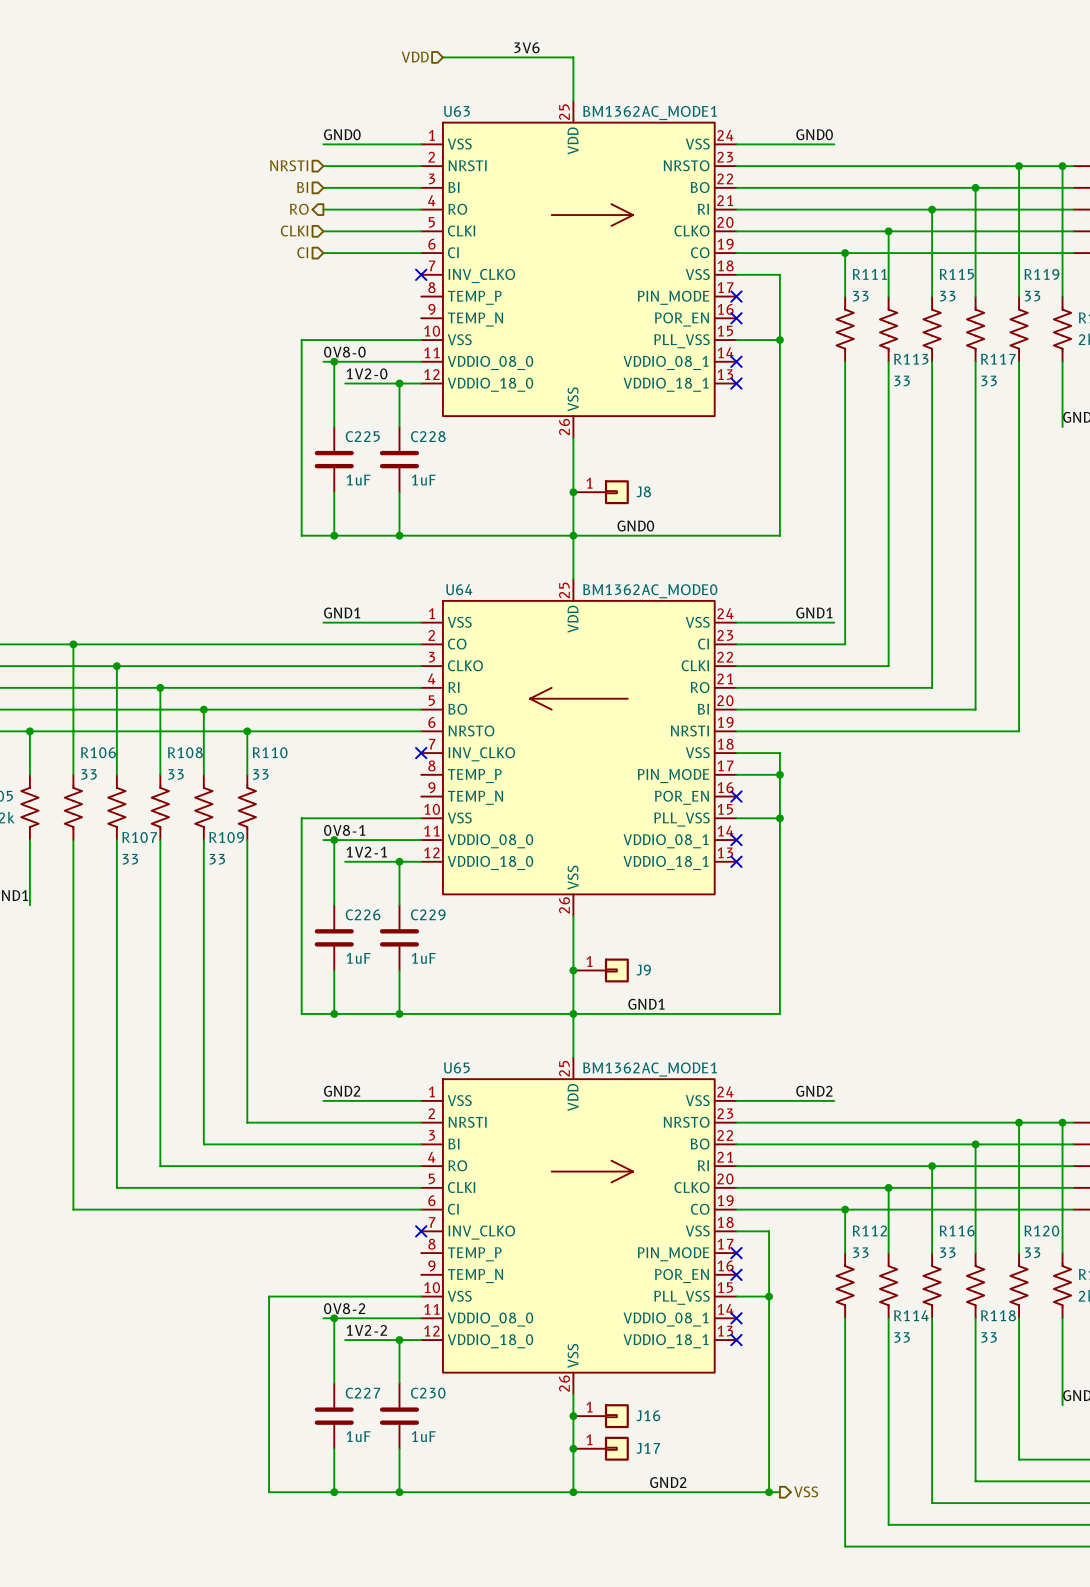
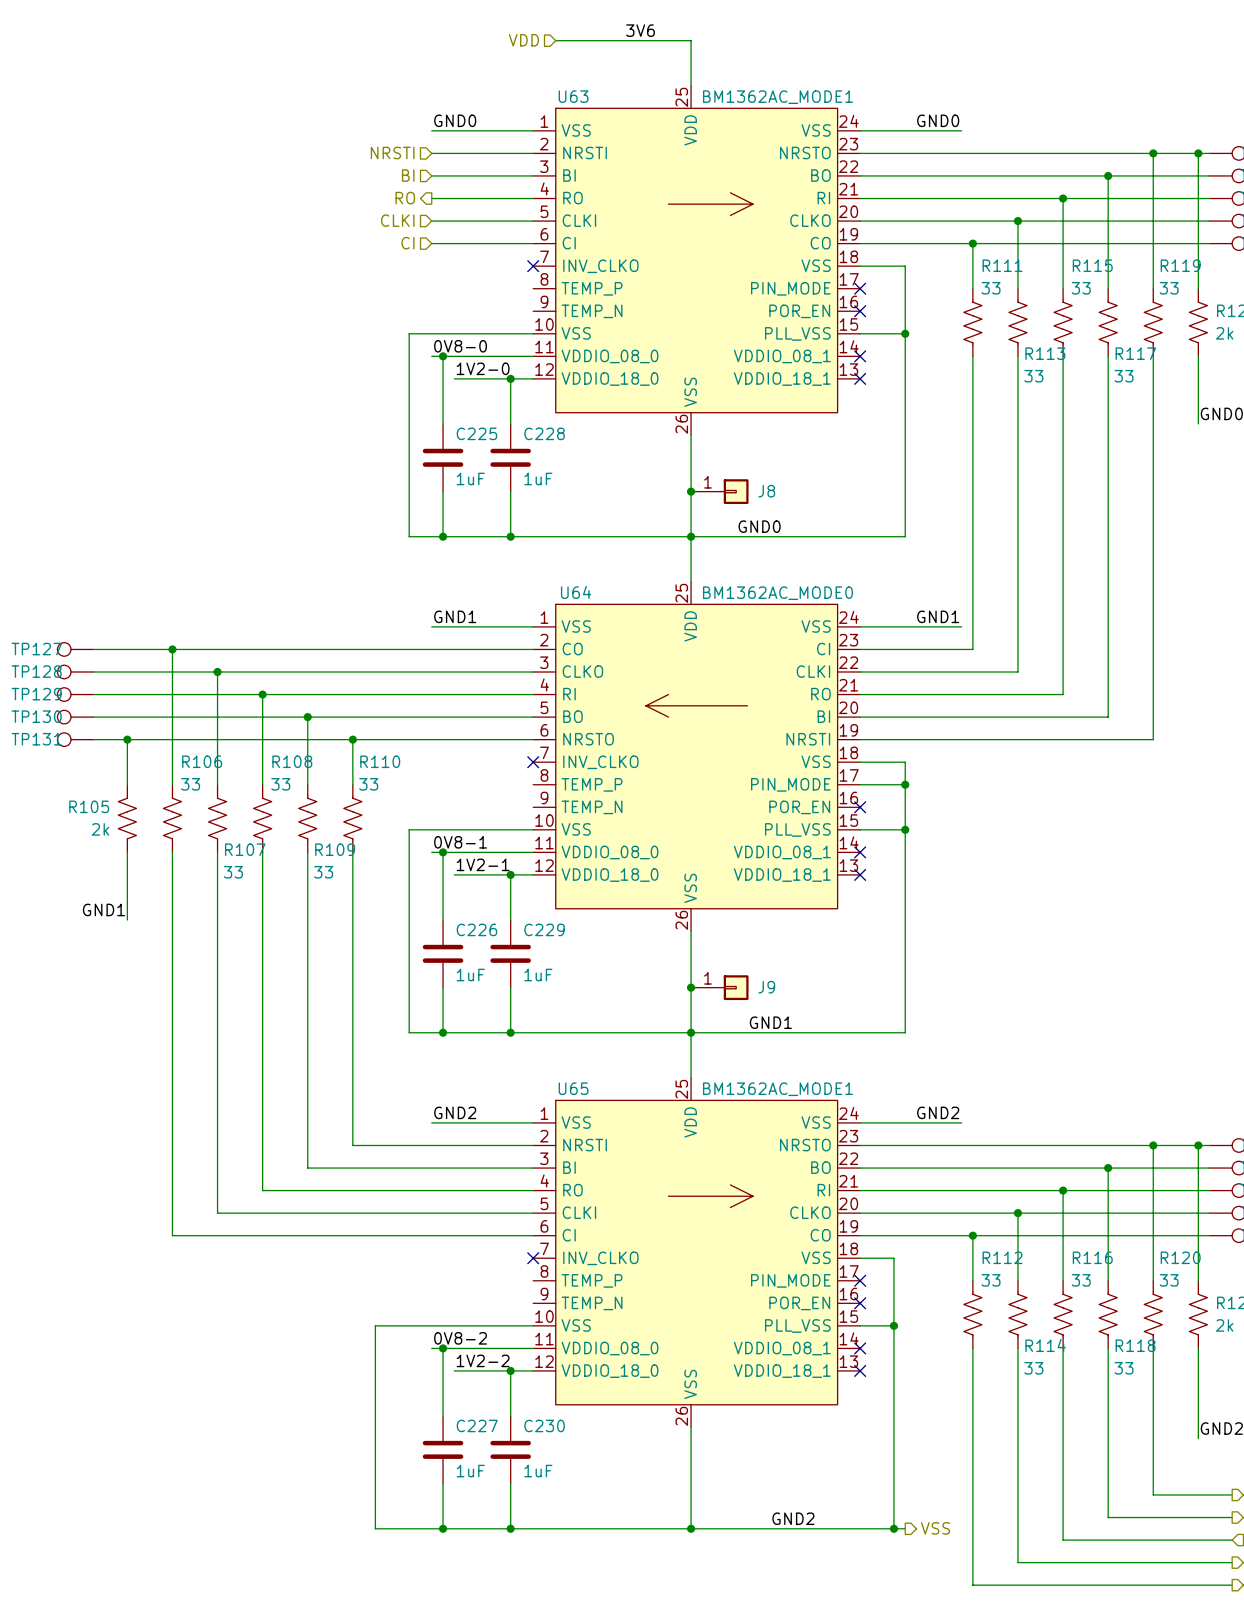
junction: (573, 1416) -> none
J16: (601, 1416) -> none
junction: (573, 1448) -> none
J17: (601, 1448) -> none

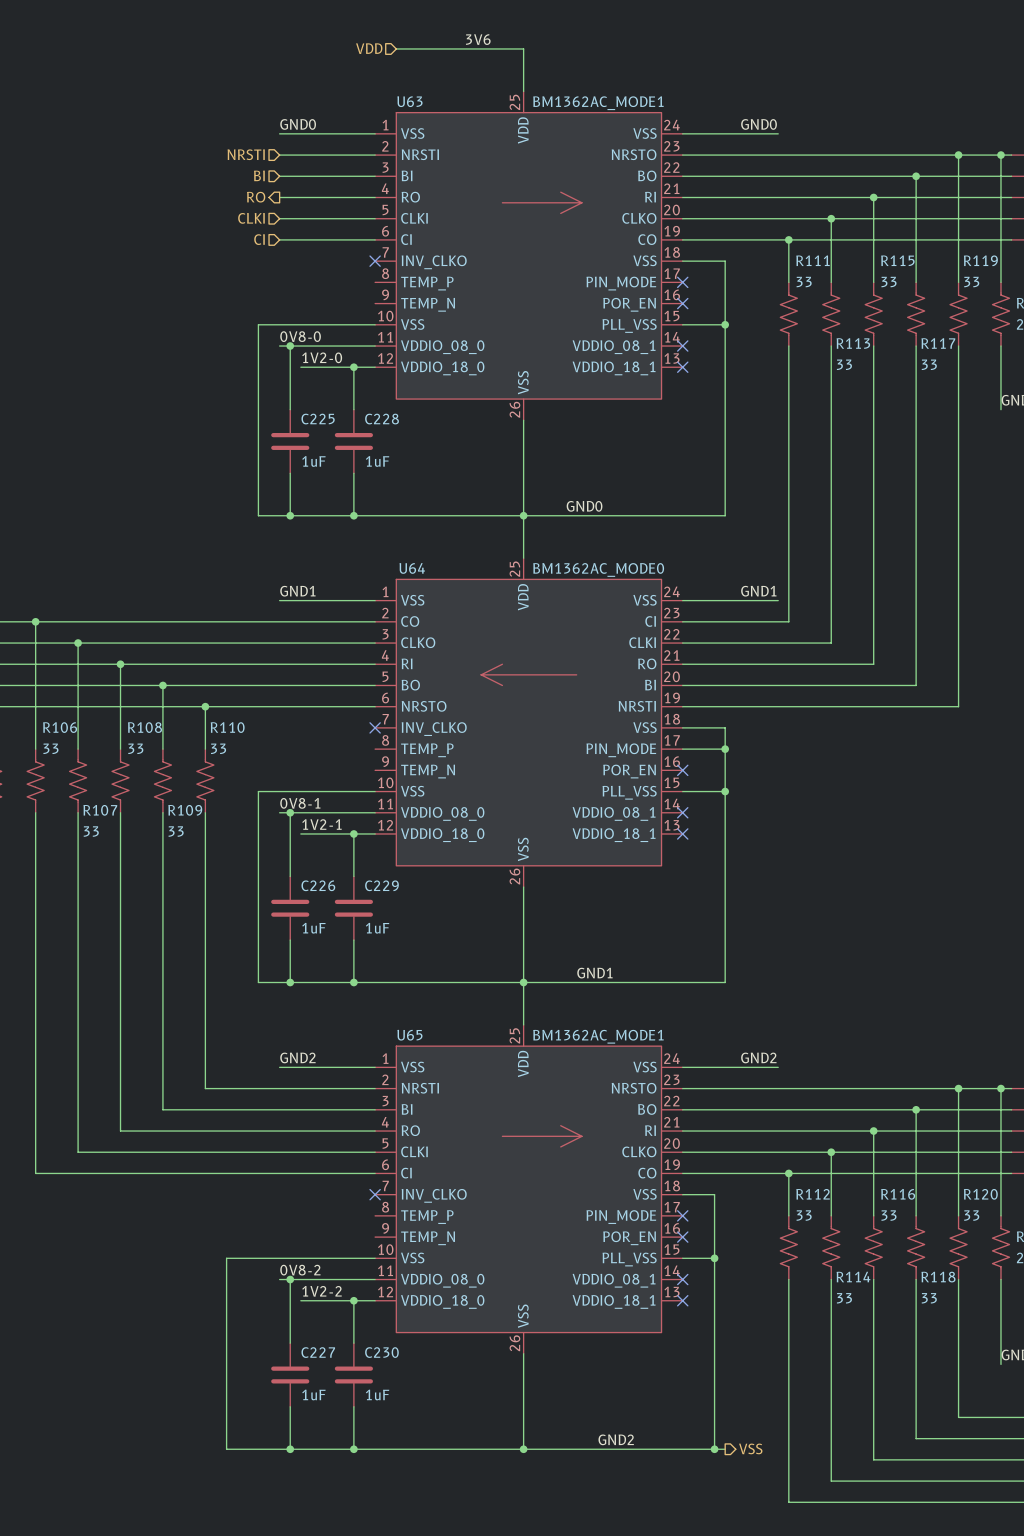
junction: (691, 491) -> none
J8: (719, 491) -> none
junction: (691, 987) -> none
J9: (719, 987) -> none

